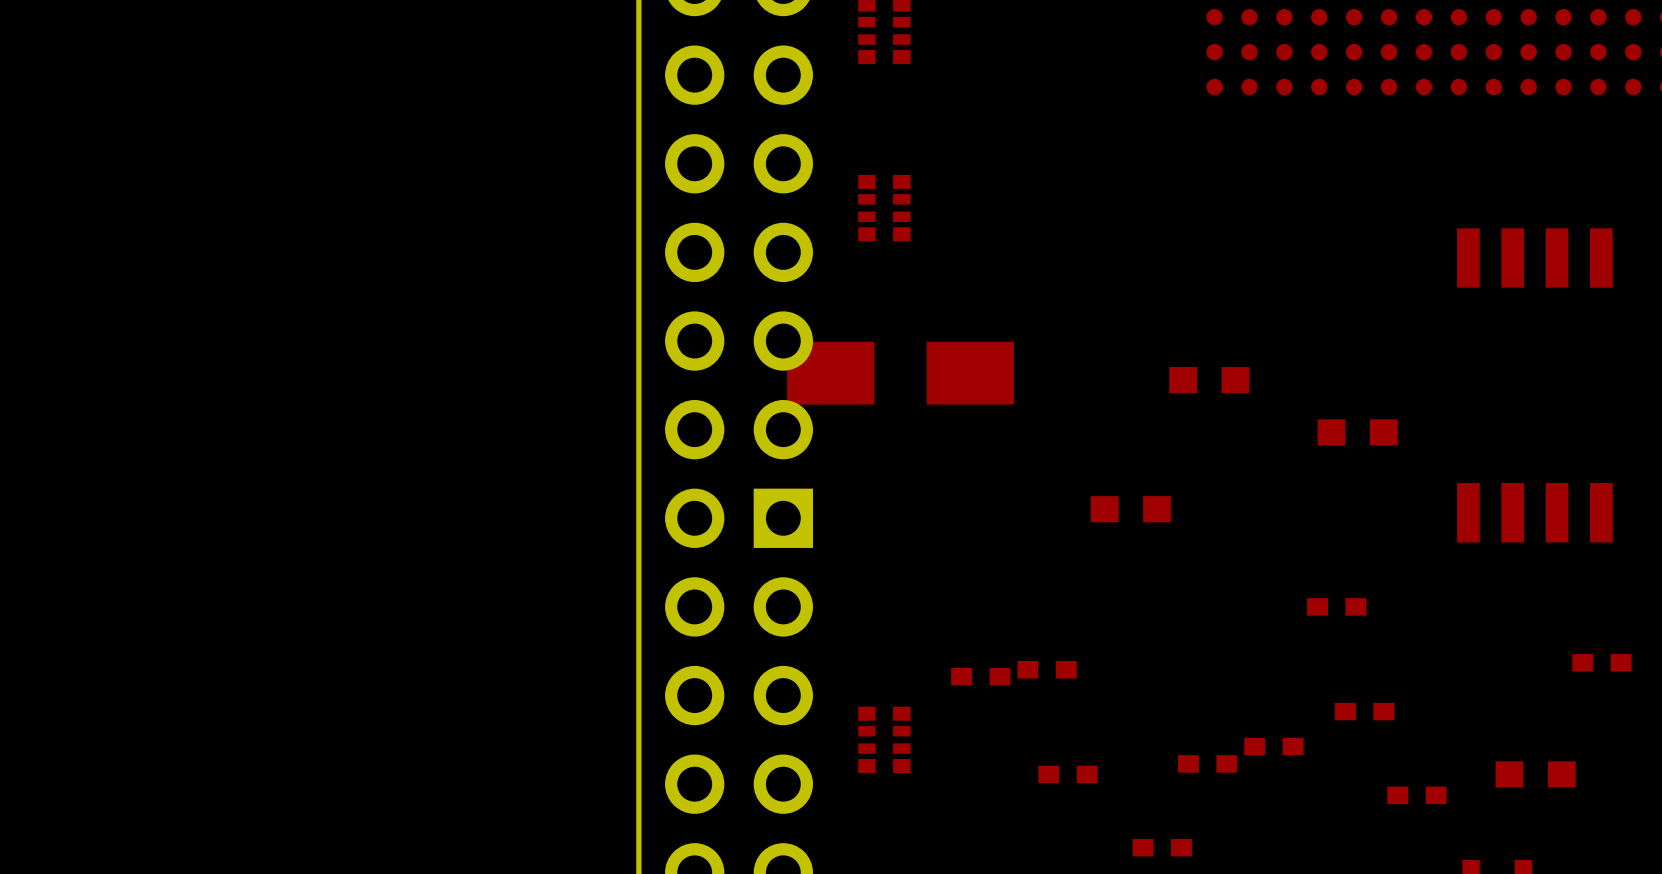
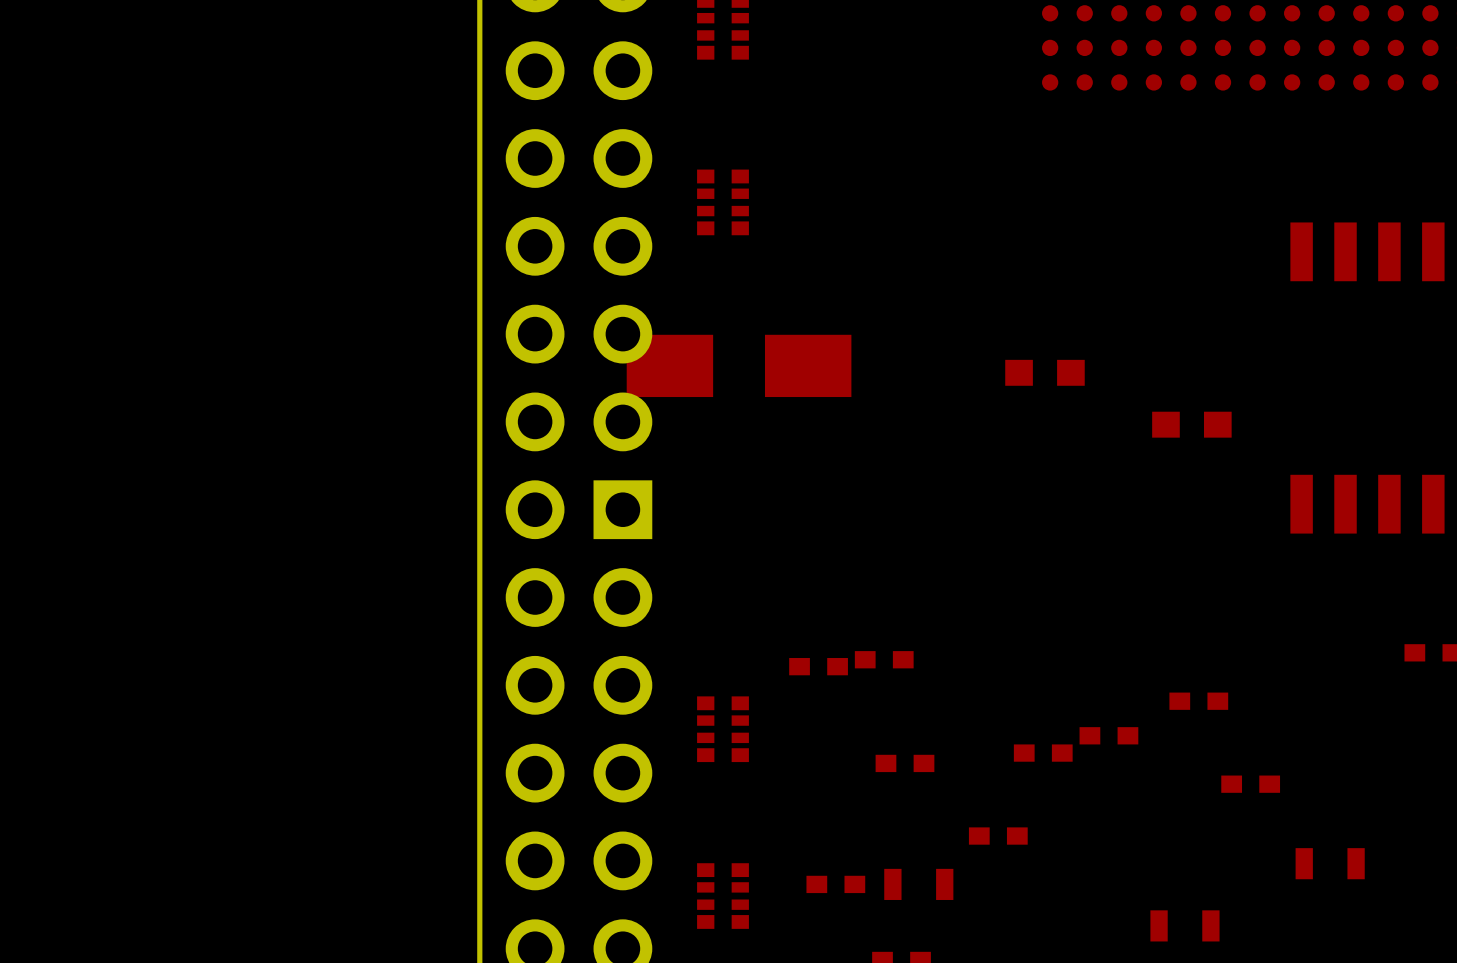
part: (1130, 509) -> none
part: (1336, 606) -> none
part: (1535, 774) -> none

